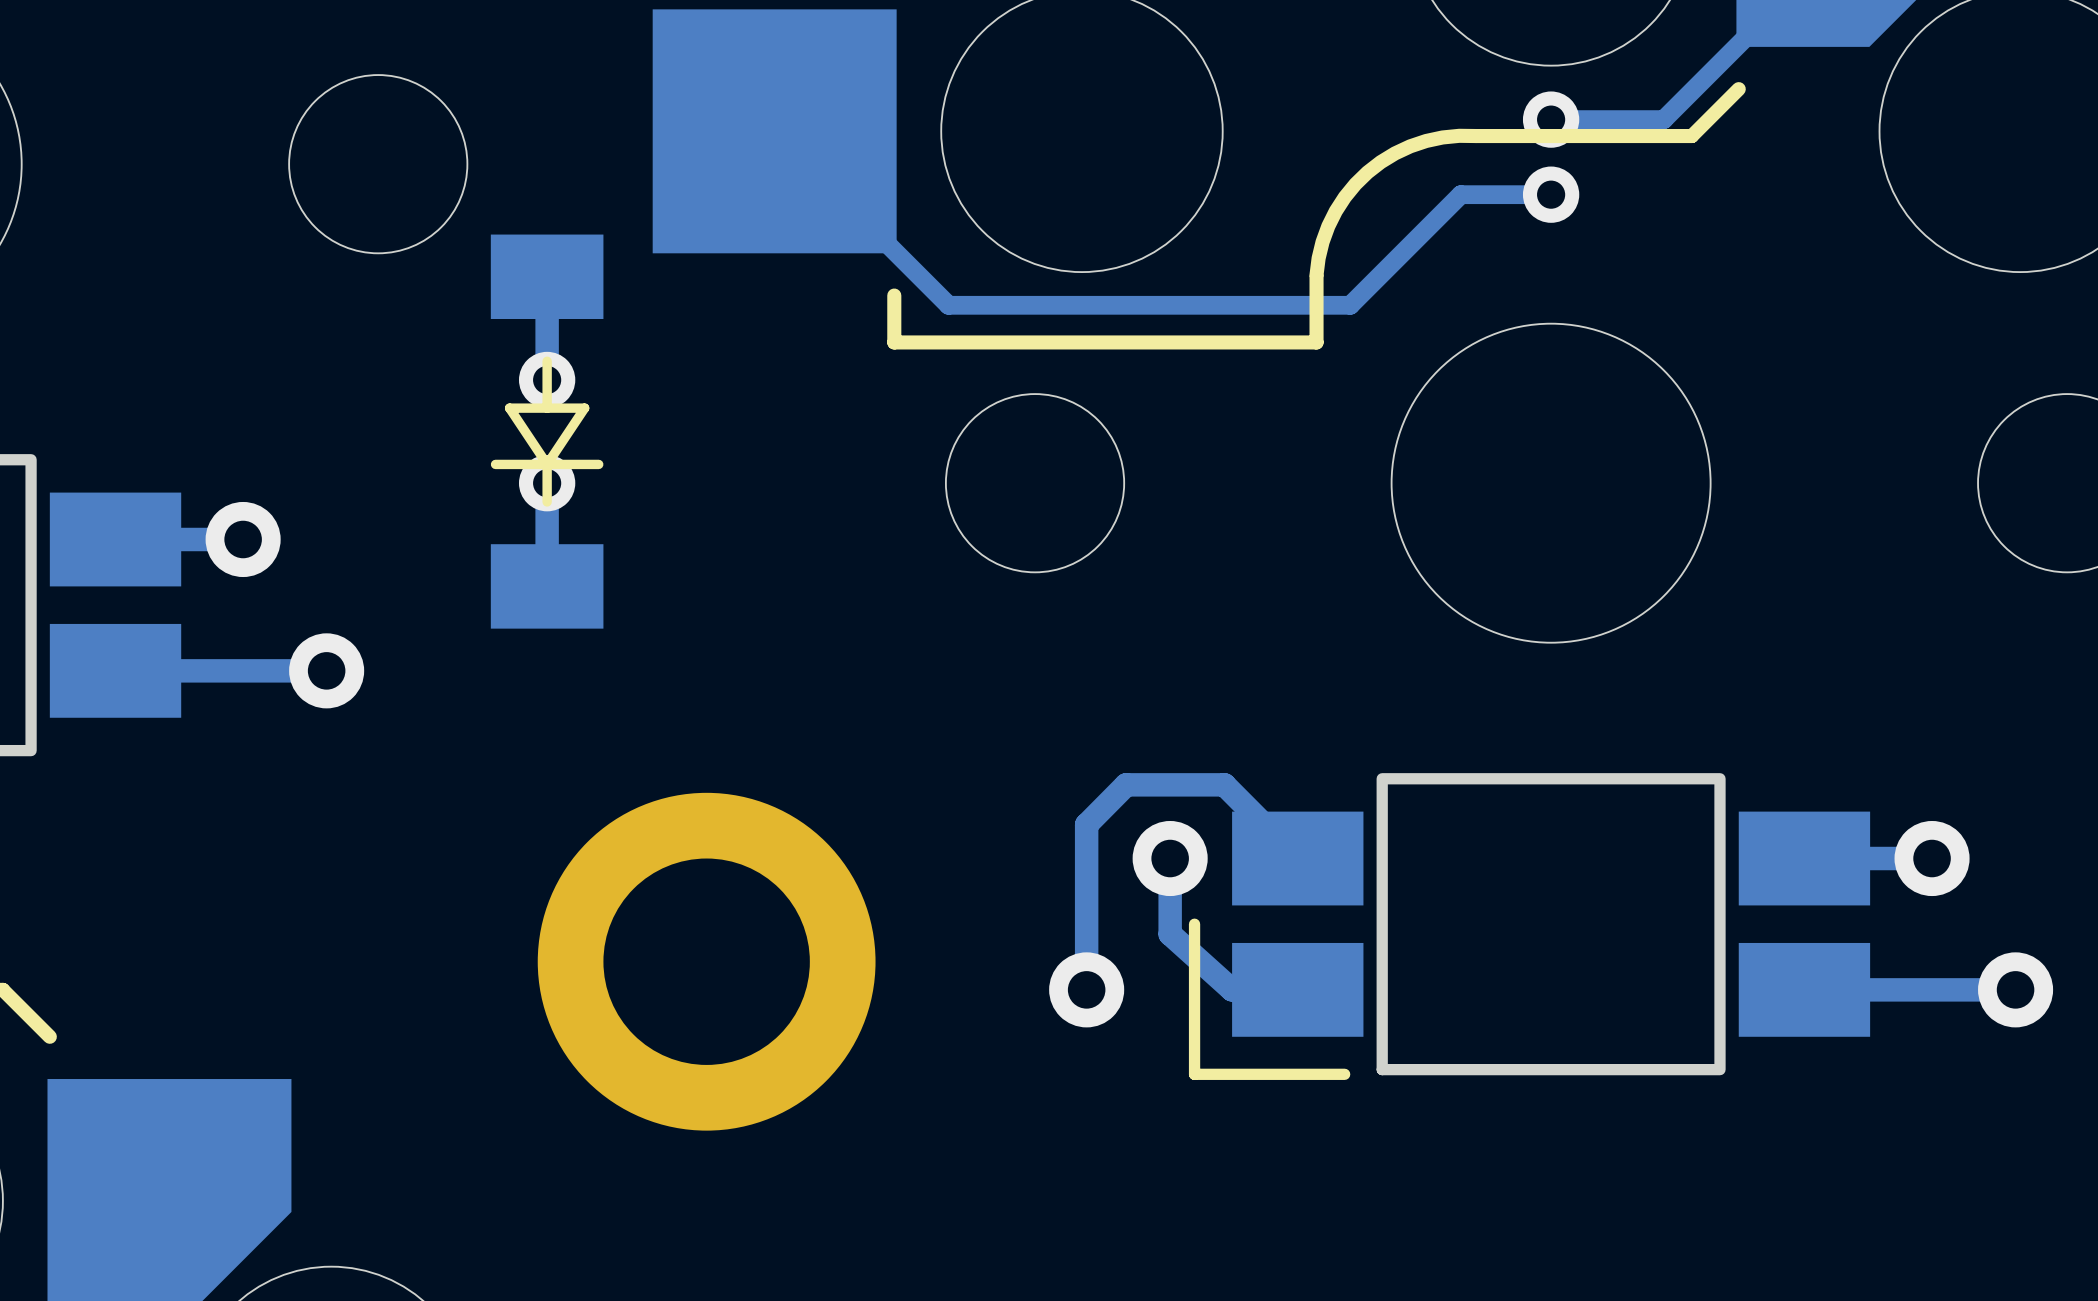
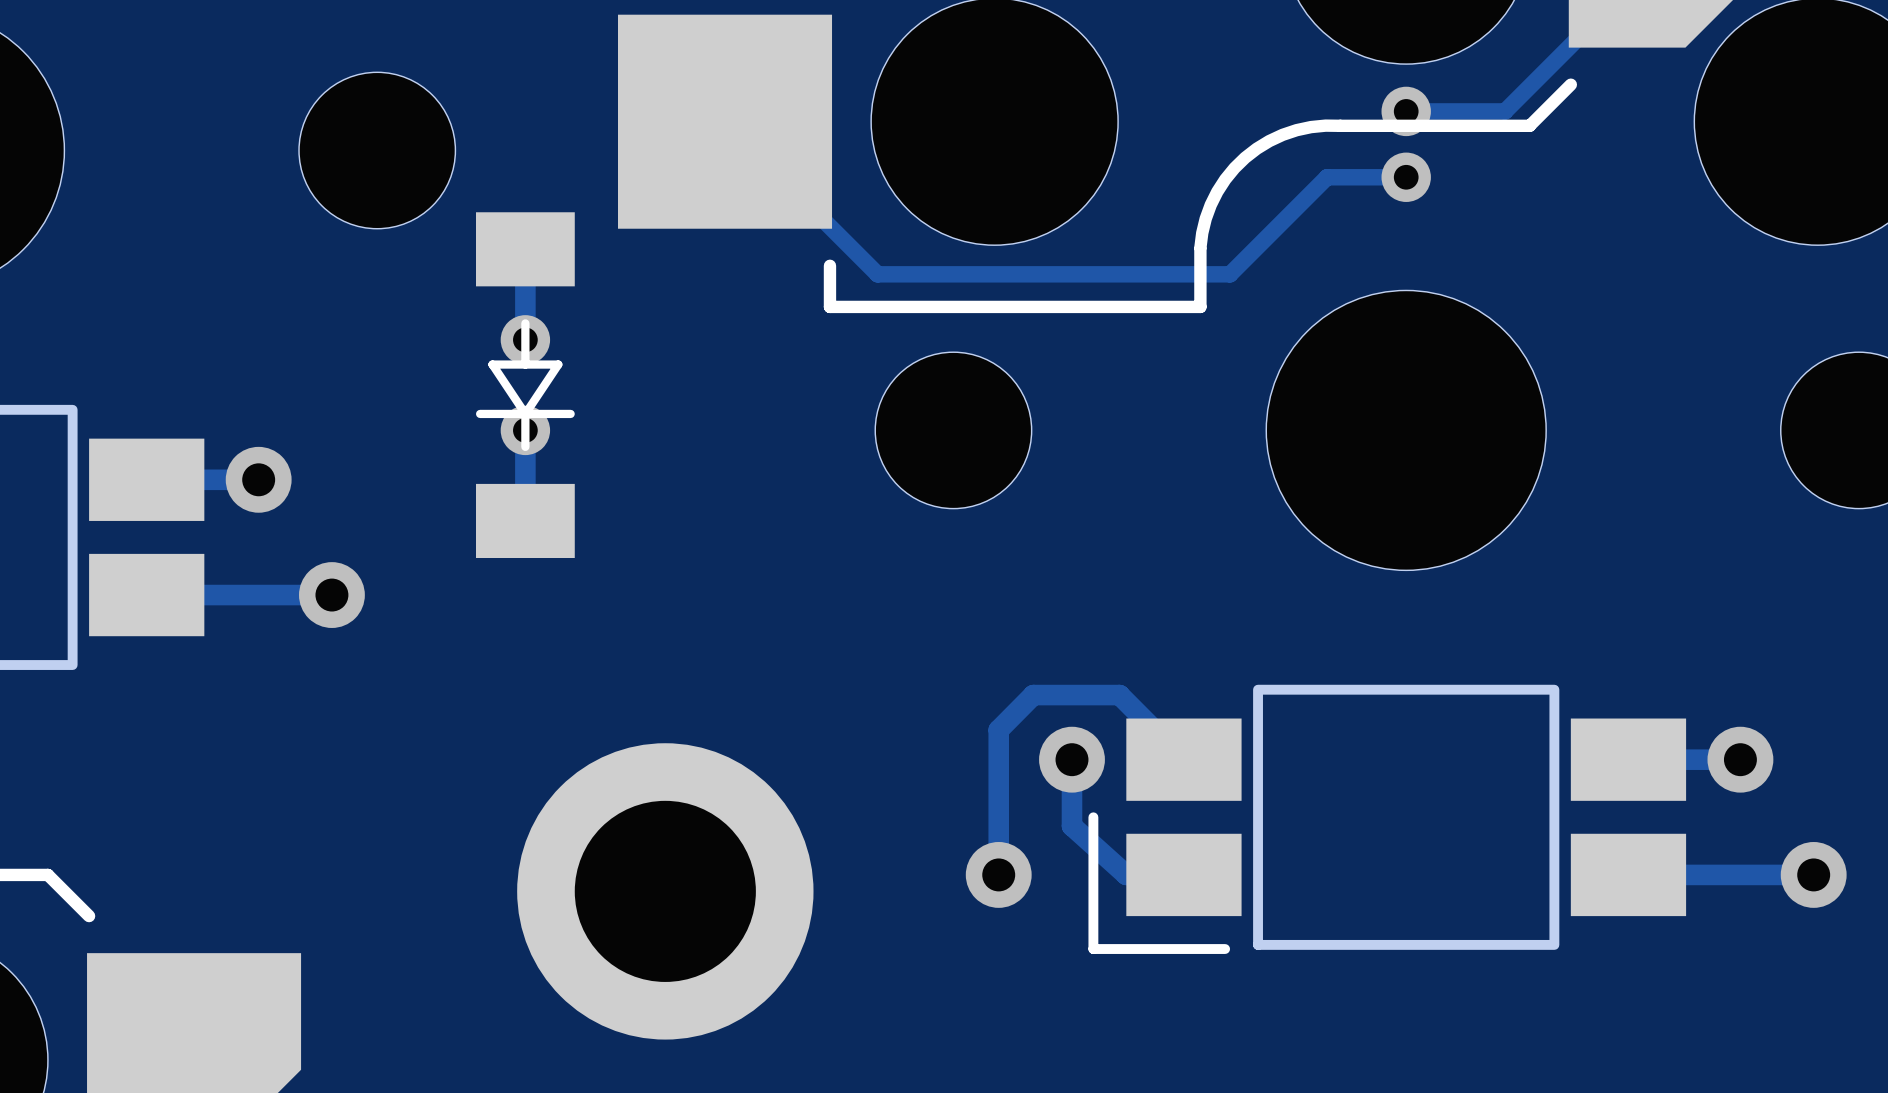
part position: (706, 961) -> (665, 891)

